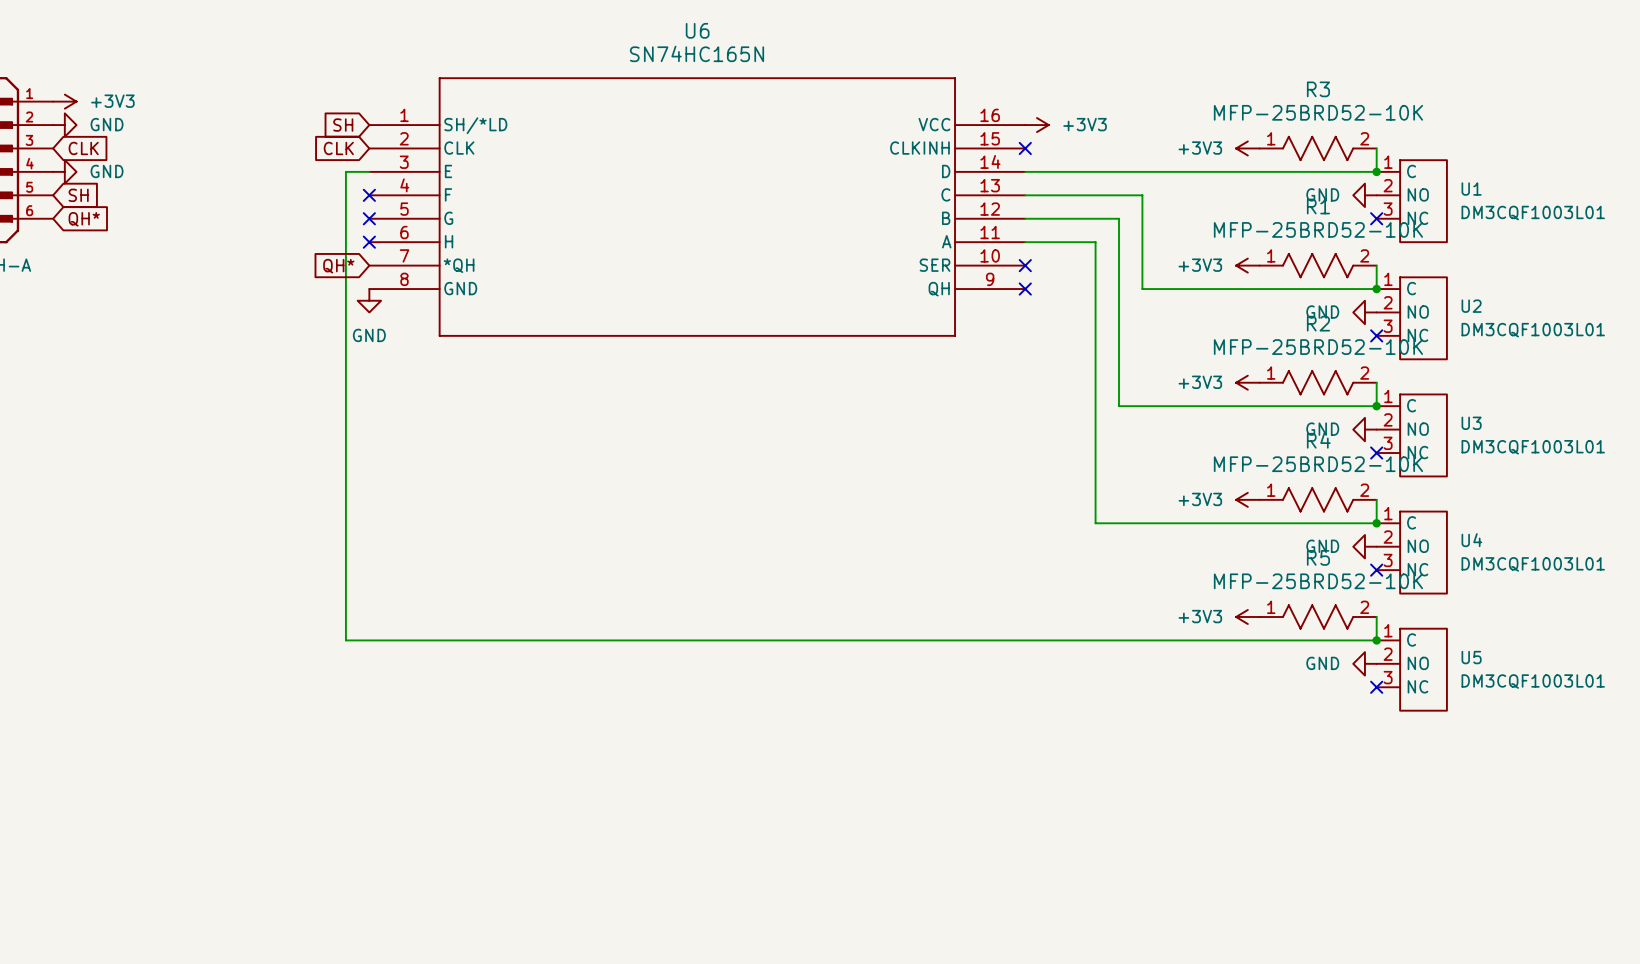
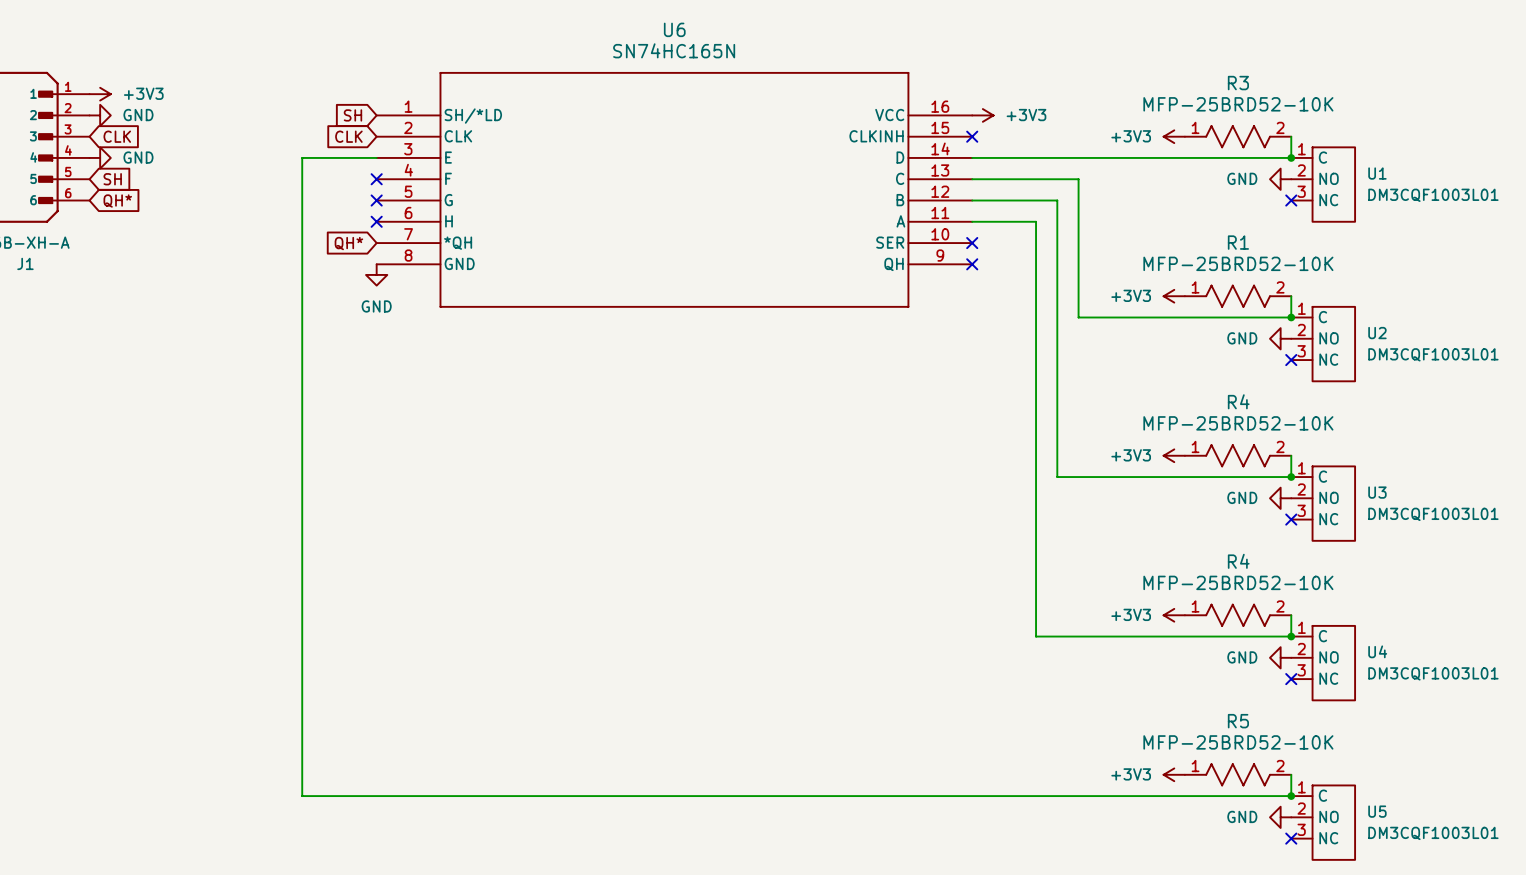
wire: (345, 171) (345, 640) (1376, 640) (1376, 616) -> (355, 157) (302, 157) (302, 796) (1291, 796) (1291, 774)
power symbol: +3V3 (1247, 265) -> none
R1 position: (1318, 265) -> (1238, 296)
wire: (1376, 265) (1376, 289) (1142, 289) -> (1291, 296) (1291, 317) (1078, 317) (1078, 264)
junction: (1376, 289) -> none
power symbol: GND (1364, 312) -> none
U2 position: (1411, 318) -> (1323, 344)
power symbol: none -> +3V3 (1174, 296)
no-connect mark: (1376, 335) -> none
junction: none -> (1291, 317)
power symbol: none -> GND (1280, 338)
power symbol: +3V3 (1247, 382) -> none
R2: MFP-25BRD52-10K (1318, 382) -> none
wire: (1376, 382) (1376, 406) (1118, 406) -> none
no-connect mark: none -> (1291, 360)
junction: (1376, 406) -> none
power symbol: GND (1364, 429) -> none
U3: DM3CQF1003L01 (1411, 435) -> none
no-connect mark: (1376, 453) -> none
wire: (1095, 523) (1118, 523) -> (1057, 370) (1057, 477)
wire: none -> (1036, 477) (1036, 636) (1291, 636) (1291, 615)
U4 name: U4 (1471, 540) -> U3 (1377, 492)
power symbol position: +3V3 (1247, 616) -> +3V3 (1174, 615)
R5 position: (1318, 616) -> (1238, 774)
junction: (1376, 640) -> none
power symbol position: GND (1364, 663) -> GND (1280, 657)
U5 position: (1411, 669) -> (1323, 822)
R4: none -> MFP-25BRD52-10K (1238, 615)
no-connect mark: (1376, 687) -> none
junction: none -> (1291, 636)
U4: none -> DM3CQF1003L01 (1323, 663)
no-connect mark: none -> (1291, 679)
power symbol: none -> +3V3 (1174, 774)
junction: none -> (1291, 796)
power symbol: none -> GND (1280, 817)
no-connect mark: none -> (1291, 838)

